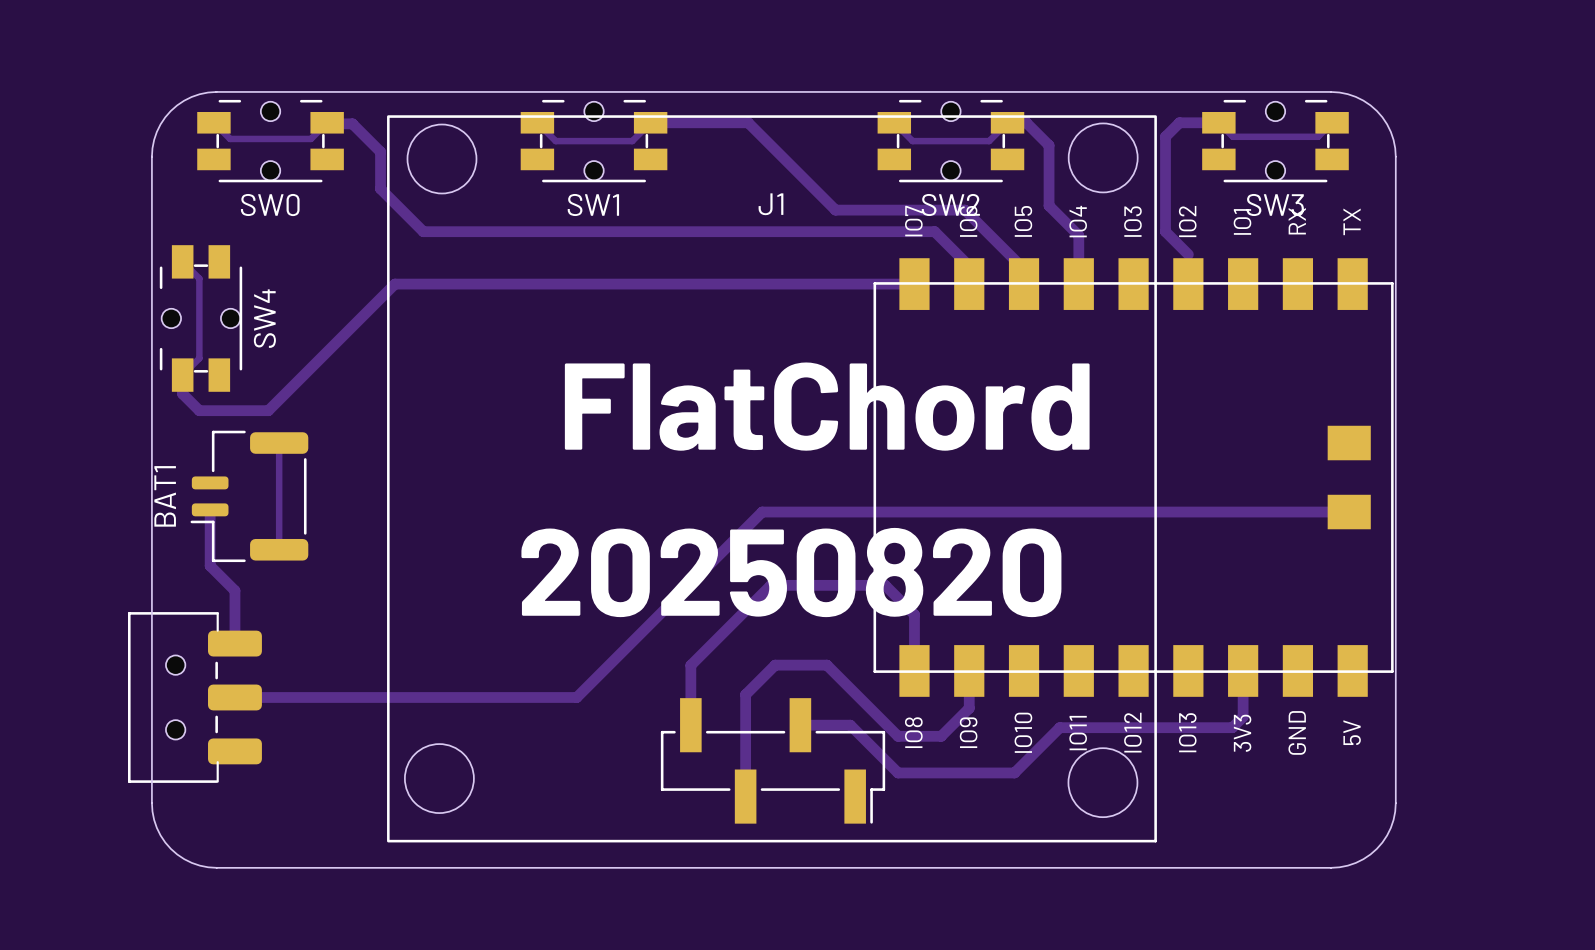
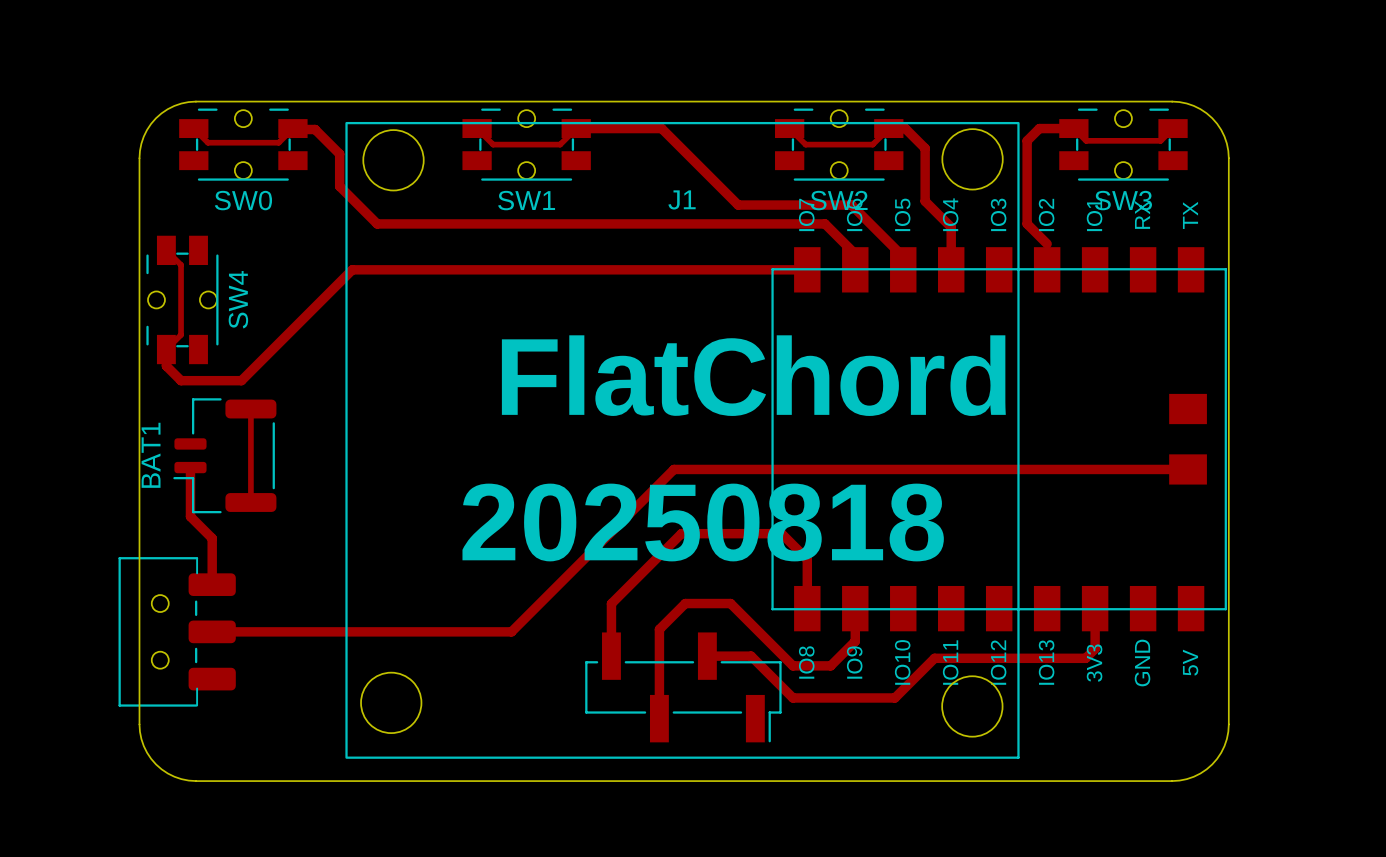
text: 20250820 (791, 572) -> 20250818 (703, 522)

